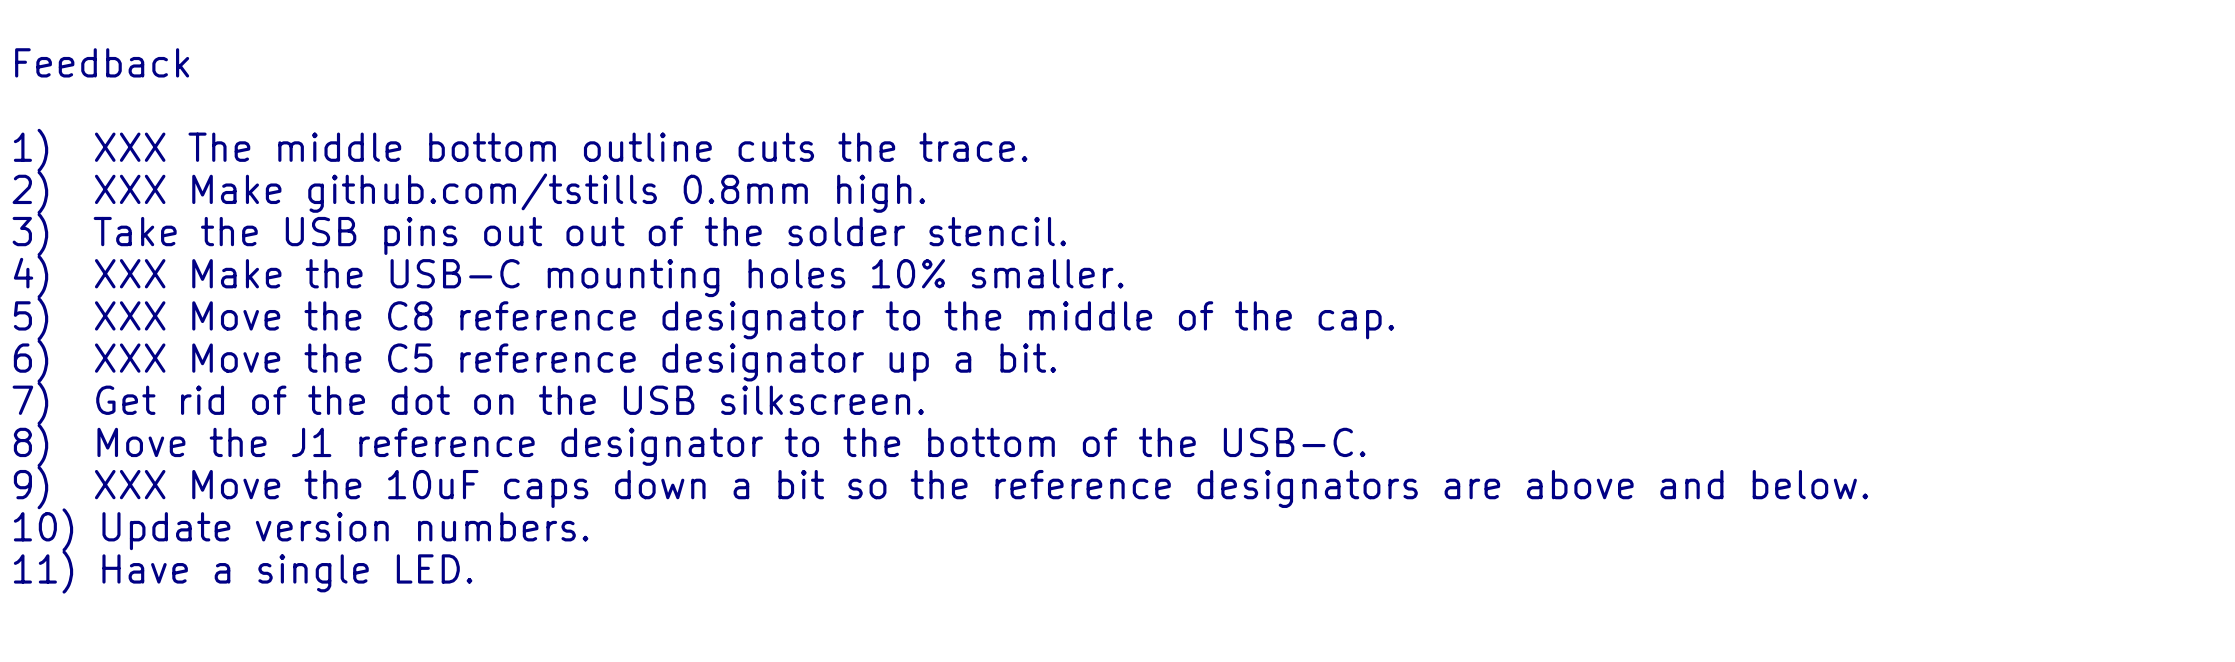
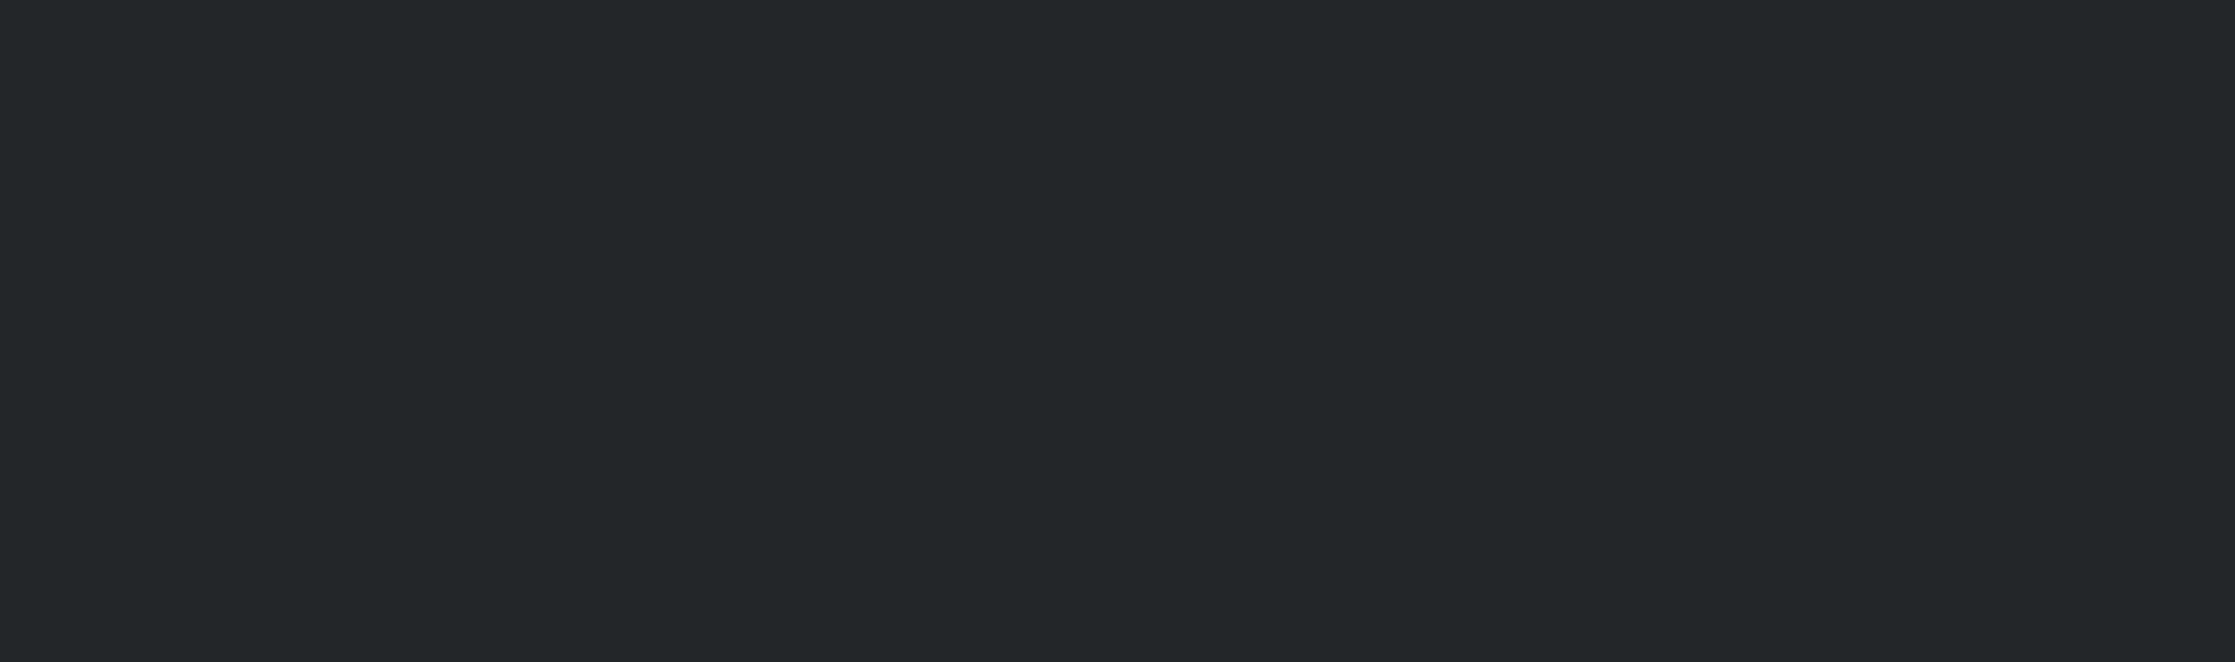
text: Feedback (102, 62) -> none
text: 1) XXX The middle bottom outline cuts the trace. (520, 150) -> none
text: 2) XXX Make github.com/tstills 0.8mm high. (468, 192) -> none
text: 3) Take the USB pins out out of the solder stencil. (539, 234) -> none
text: 4) XXX Make the USB-C mounting holes 10% smaller. (568, 276) -> none
text: 5) XXX Move the C8 reference designator to the middle of the cap. (703, 319) -> none
text: 6) XXX Move the C5 reference designator up a bit. (534, 361) -> none
text: 7) Get rid of the dot on the USB silkscreen. (468, 403) -> none
text: 8) Move the J1 reference designator to the bottom of the USB-C. (689, 445) -> none
text: 9) XXX Move the 10uF caps down a bit so the reference designators are above and below. (940, 487) -> none
text: 10) Update version numbers. (301, 529) -> none
text: 11) Have a single LED. (243, 572) -> none

